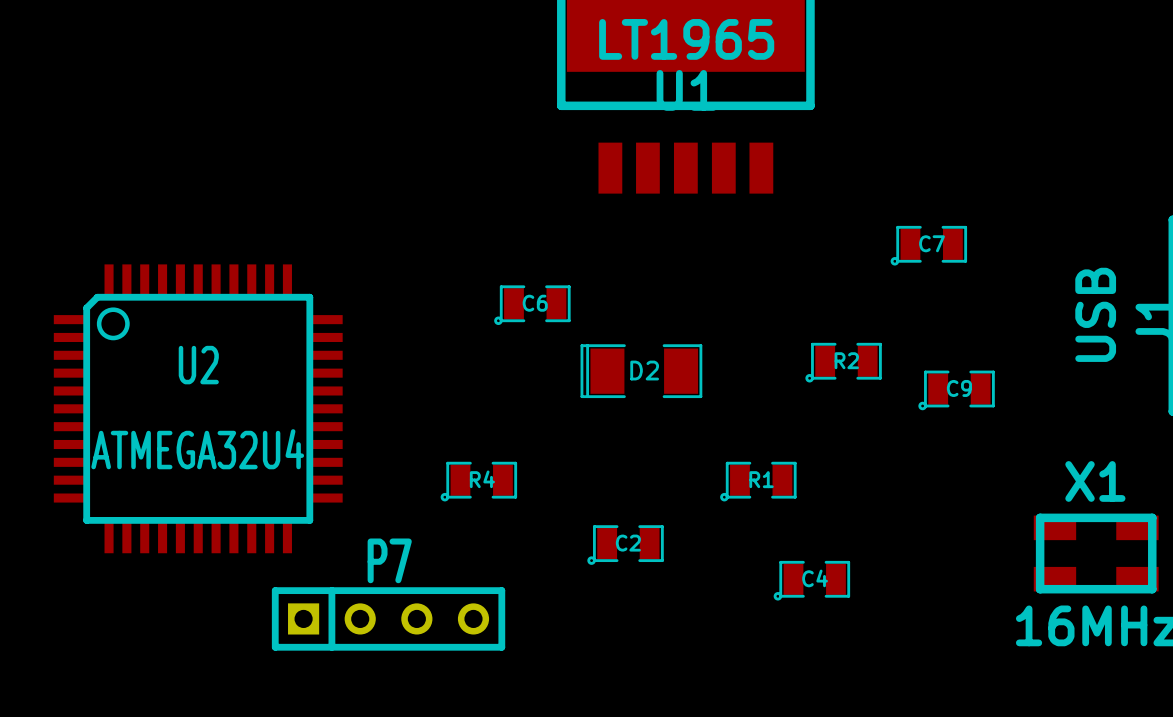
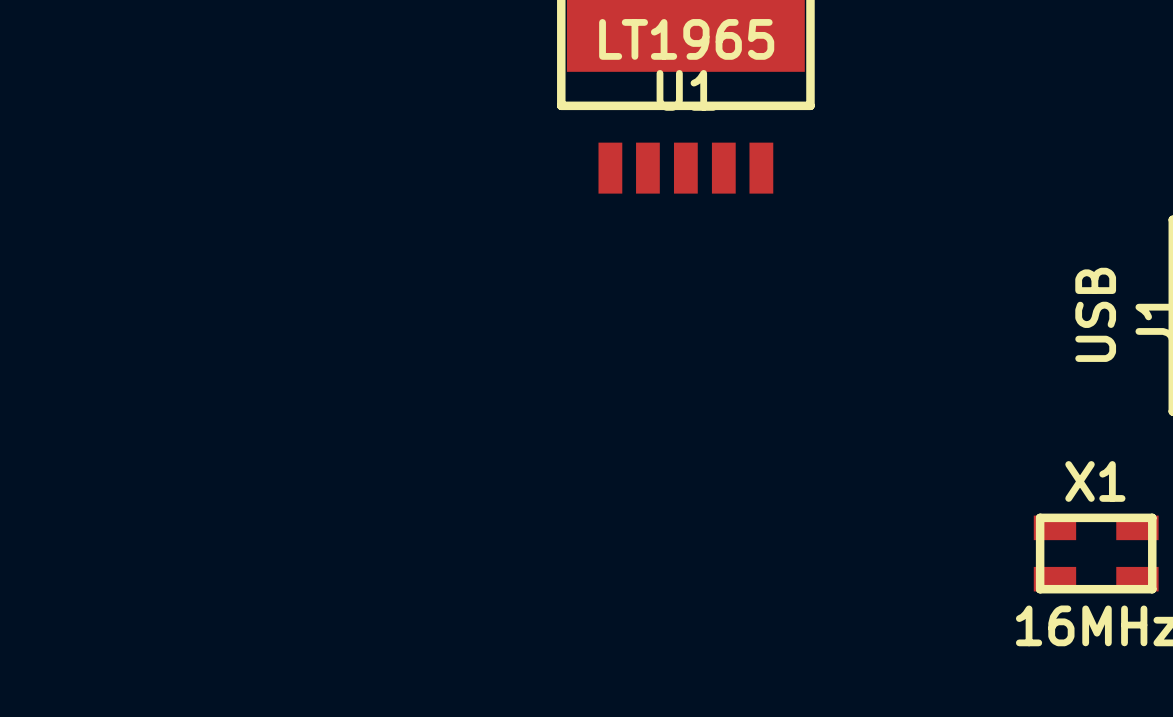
C7: (928, 245) -> none
C6: (532, 305) -> none
R2: (843, 362) -> none
D2: (641, 371) -> none
C9: (956, 390) -> none
U2: ATMEGA32U4 (198, 408) -> none
R4: (478, 481) -> none
R1: (758, 481) -> none
C2: (625, 545) -> none
C4: (811, 580) -> none
P7: (388, 618) -> none

